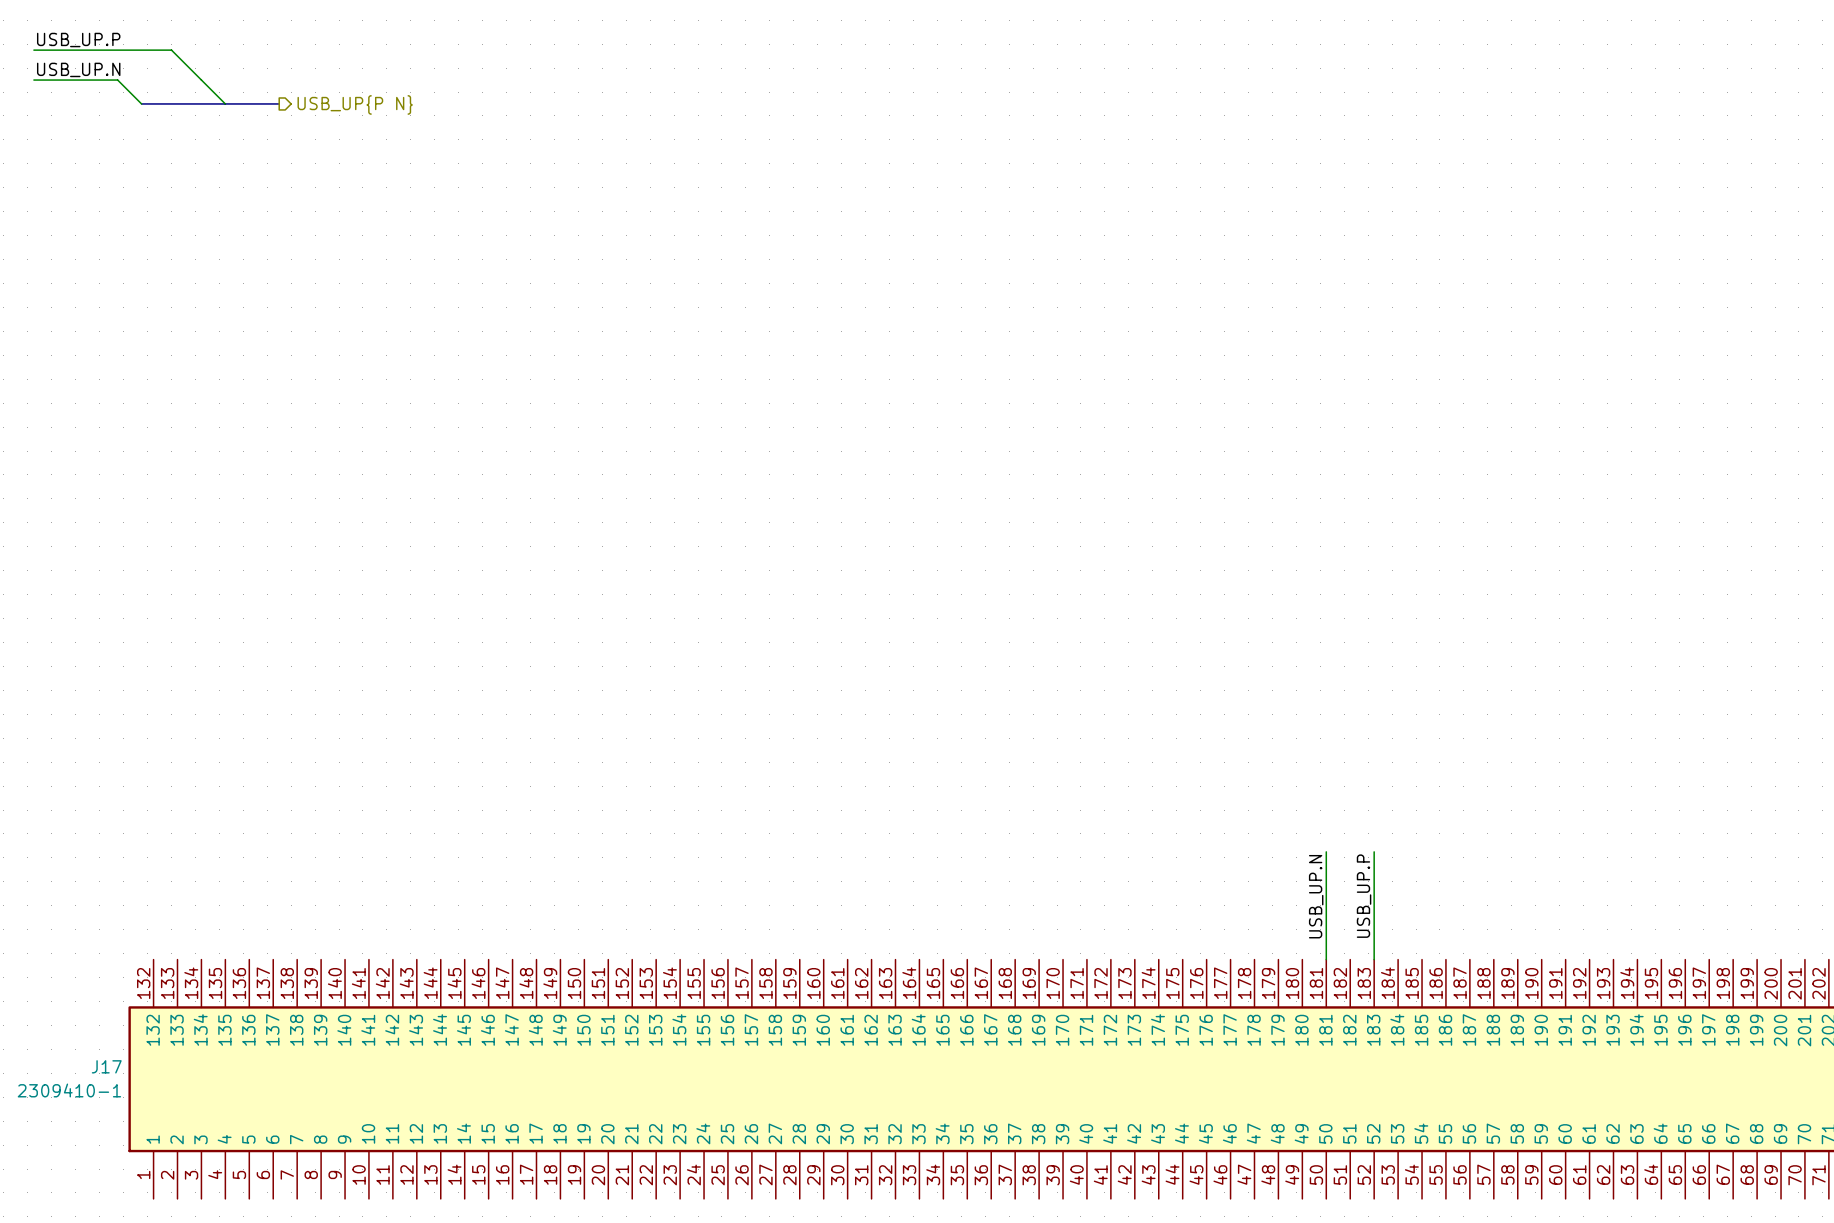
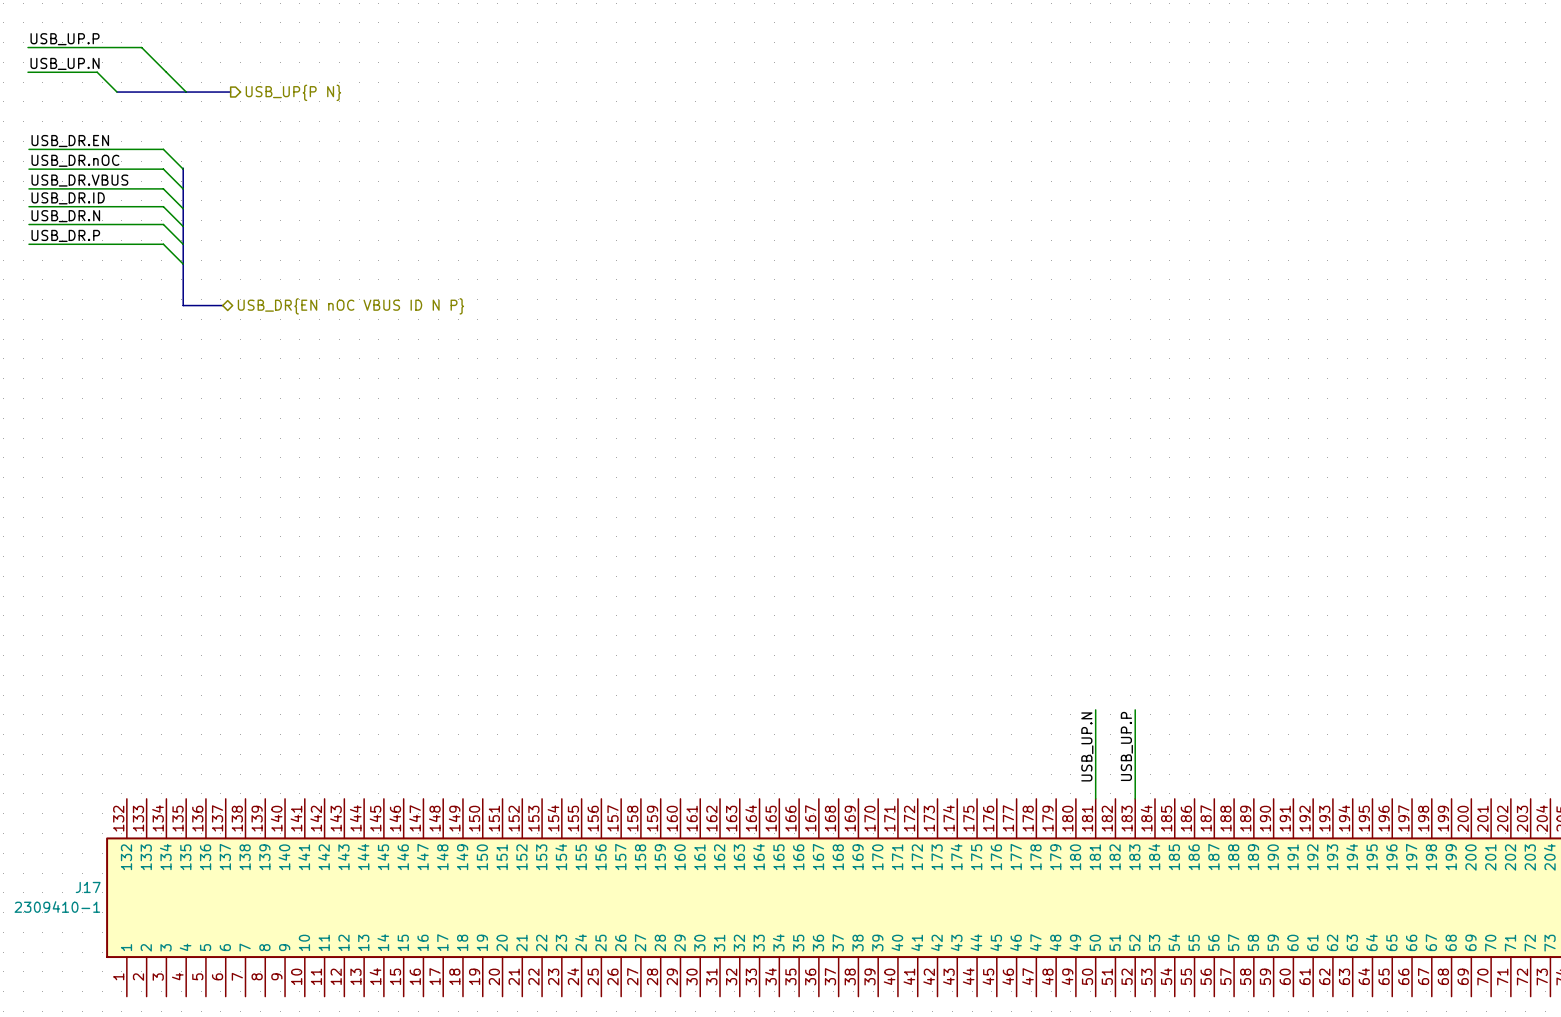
label: none -> USB_DR.EN (70, 141)
wire: none -> (28, 149) (163, 149) (183, 169)
label: none -> USB_DR.nOC (75, 160)
bus: none -> (183, 168) (183, 305) (222, 305)
wire: none -> (28, 169) (163, 169) (183, 188)
label: none -> USB_DR.VBUS (79, 180)
wire: none -> (28, 188) (163, 188) (183, 208)
label: none -> USB_DR.ID (68, 198)
wire: none -> (28, 206) (163, 206) (183, 226)
label: none -> USB_DR.N (65, 216)
wire: none -> (28, 224) (163, 224) (183, 244)
label: none -> USB_DR.P (65, 235)
wire: none -> (28, 244) (163, 244) (183, 264)
hierarchical label: none -> USB_DR{EN nOC VBUS ID N P} (350, 306)

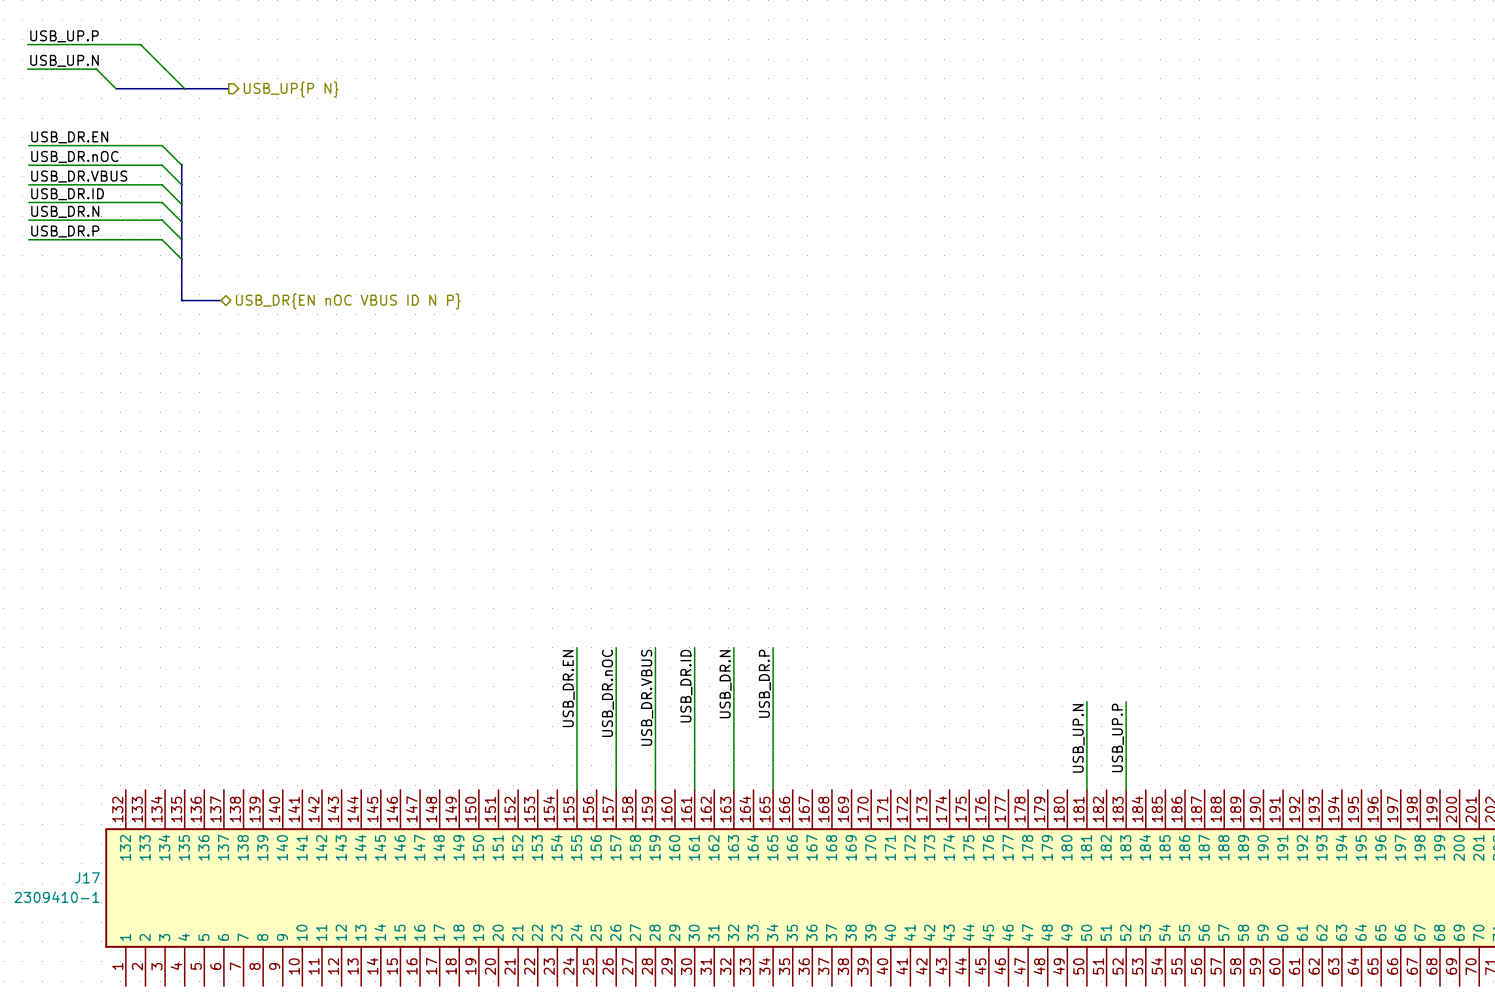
wire: none -> (576, 647) (576, 789)
wire: none -> (616, 647) (616, 789)
wire: none -> (655, 647) (655, 789)
wire: none -> (694, 647) (694, 789)
wire: none -> (733, 647) (733, 789)
wire: none -> (773, 647) (773, 789)
label: none -> USB_DR.P (764, 683)
label: none -> USB_DR.N (725, 684)
label: none -> USB_DR.ID (686, 686)
label: none -> USB_DR.EN (568, 688)
label: none -> USB_DR.nOC (607, 693)
label: none -> USB_DR.VBUS (647, 697)

